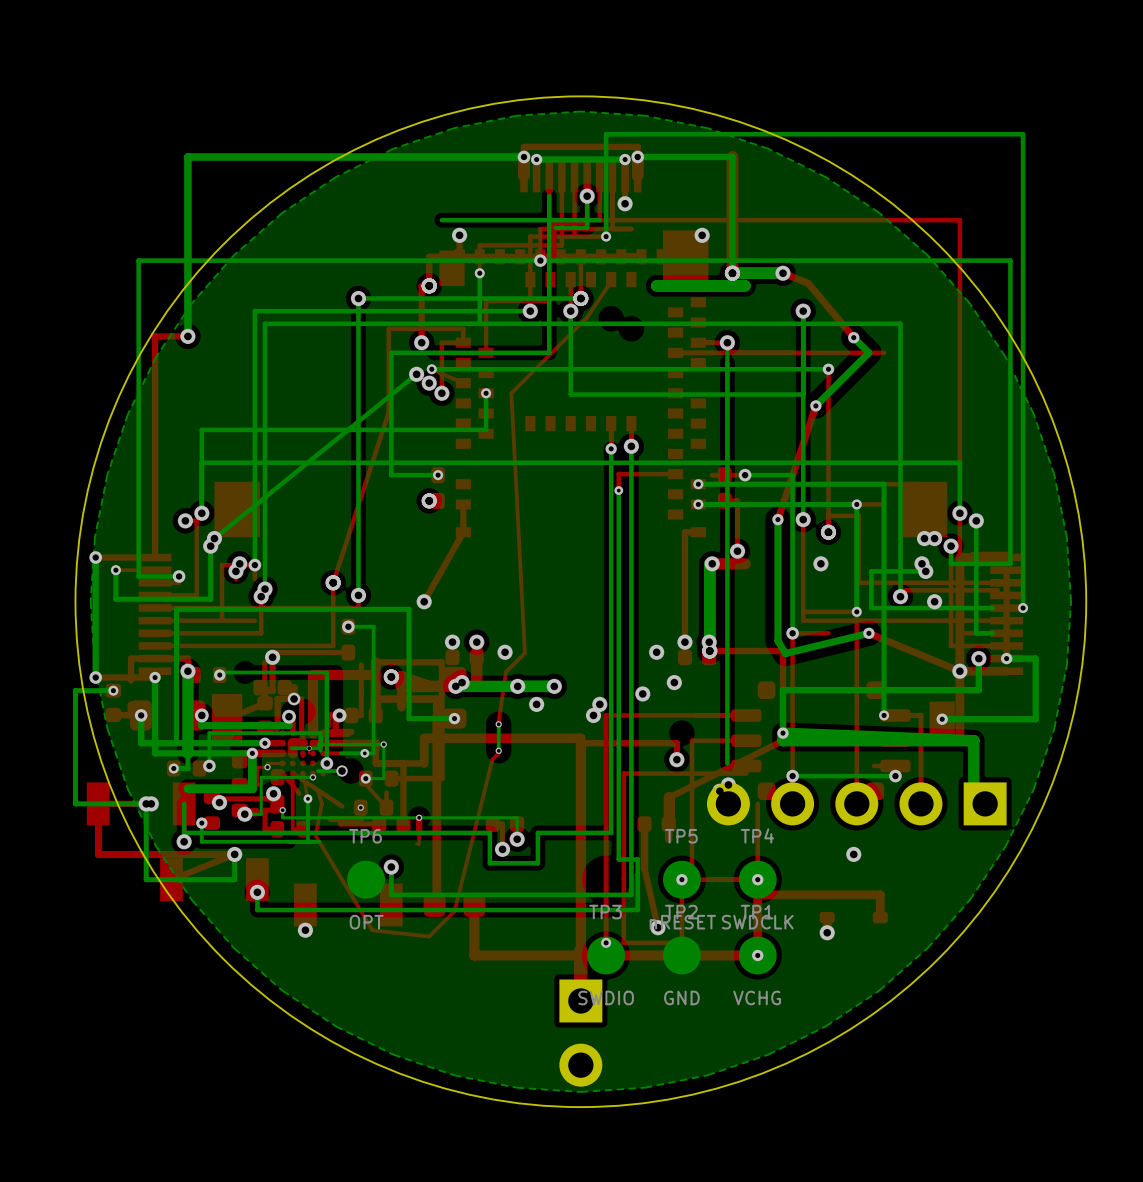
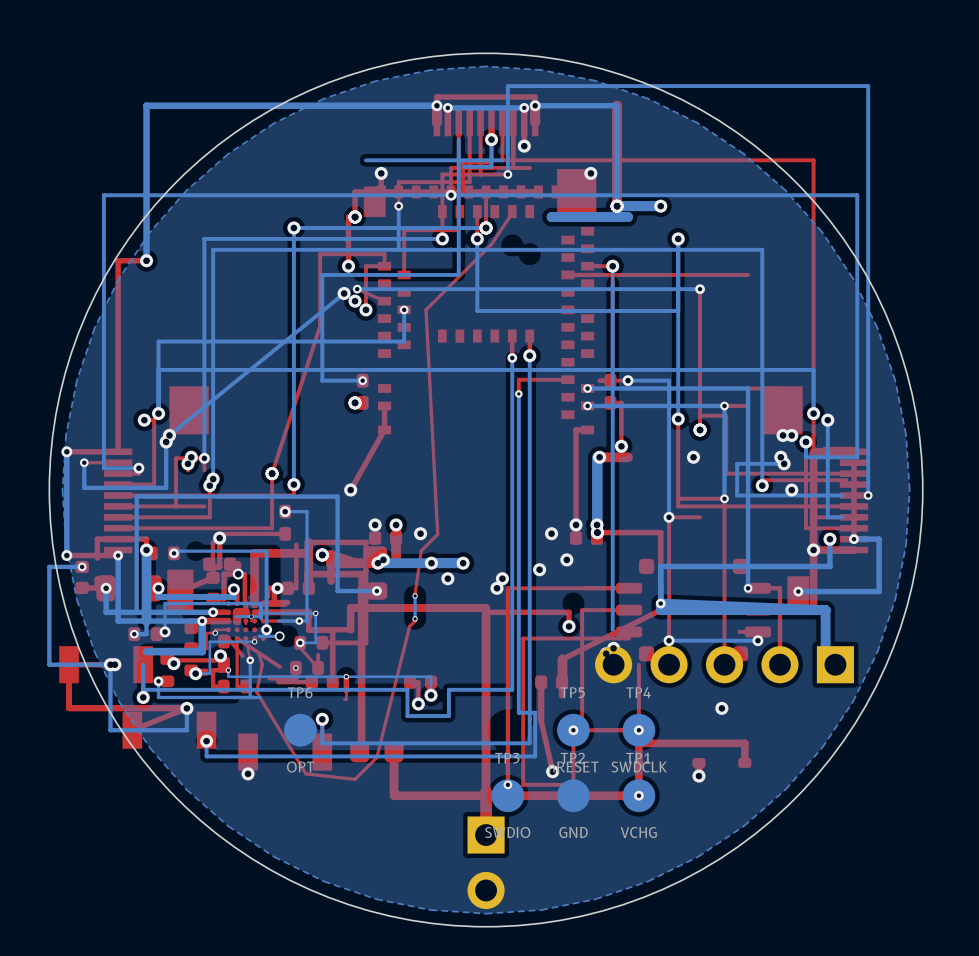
top track: (783, 273) (808, 283) (853, 337) -> none
bottom track: (853, 337) (868, 352) (815, 405) -> none
via: (853, 337) -> none
top track: (815, 405) (777, 519) -> none
via: (815, 405) -> none
bottom track: (777, 519) (777, 640) (785, 653) (868, 633) -> none
via: (777, 519) -> none
top track: (868, 633) (959, 671) -> none
via: (868, 633) -> none

